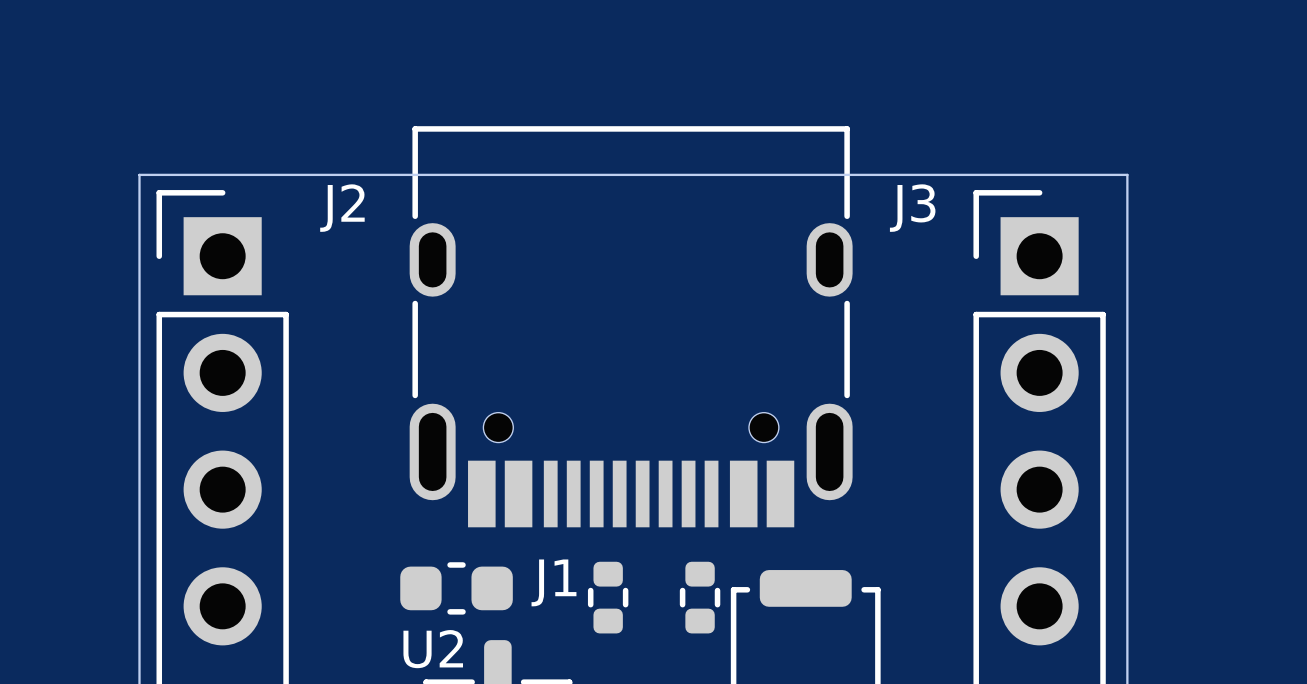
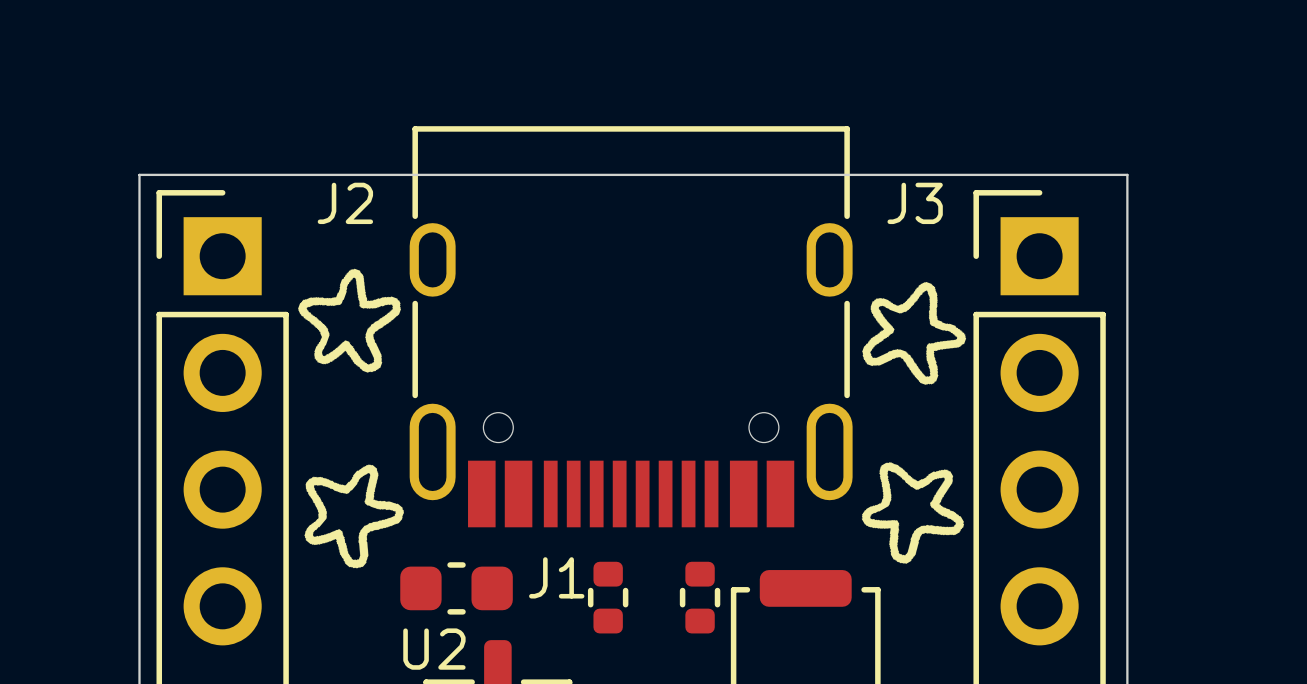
drawing: none -> [298, 268, 401, 373]
drawing: none -> [862, 281, 967, 385]
drawing: none -> [861, 462, 965, 564]
drawing: none -> [304, 464, 405, 569]

